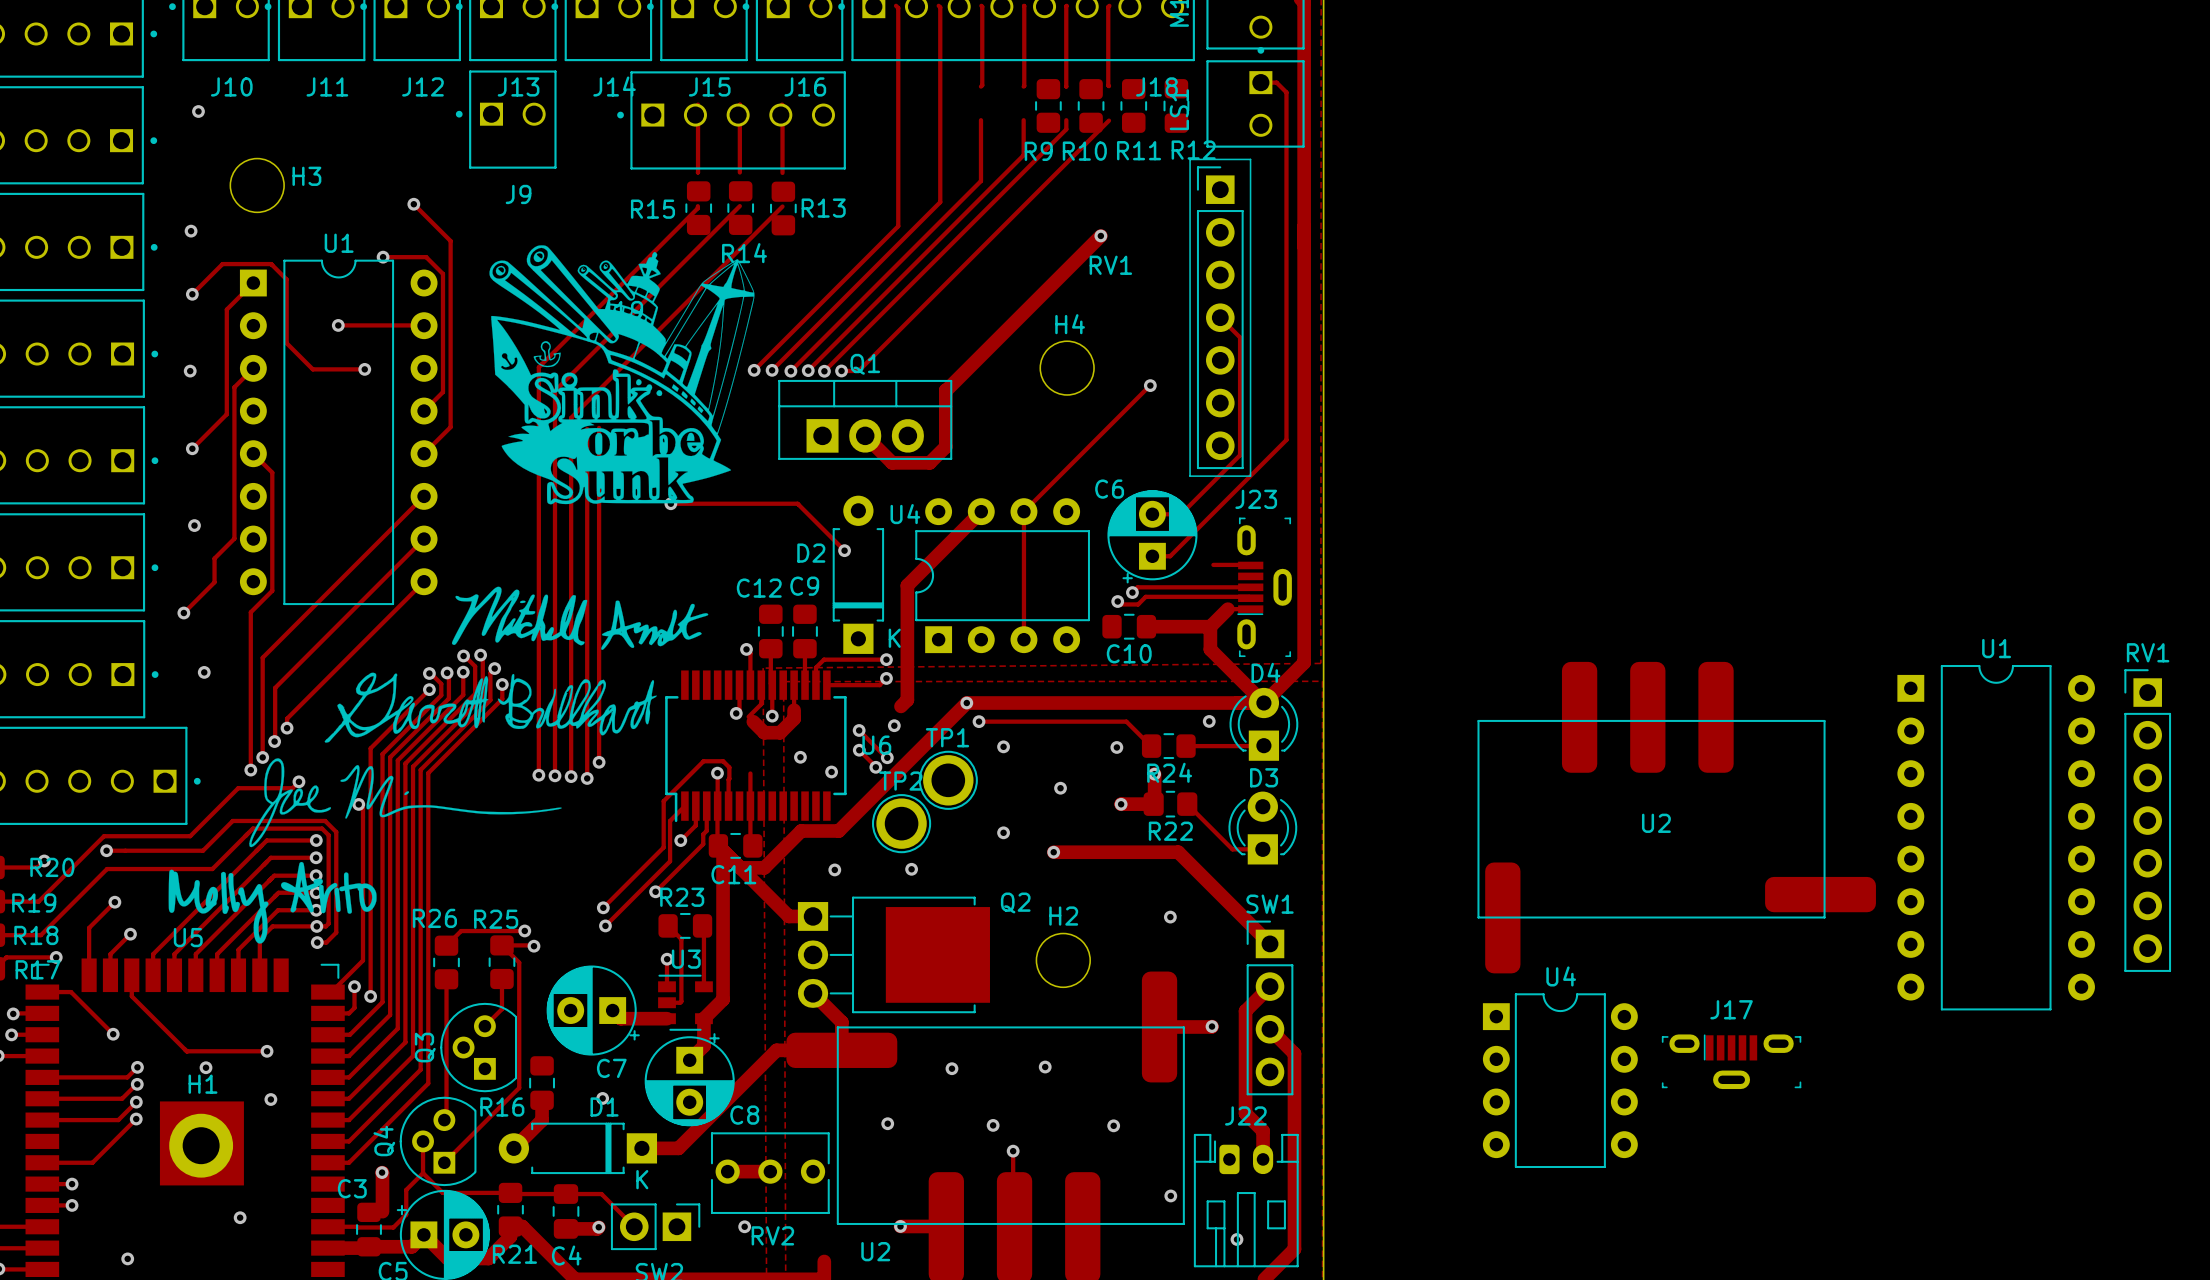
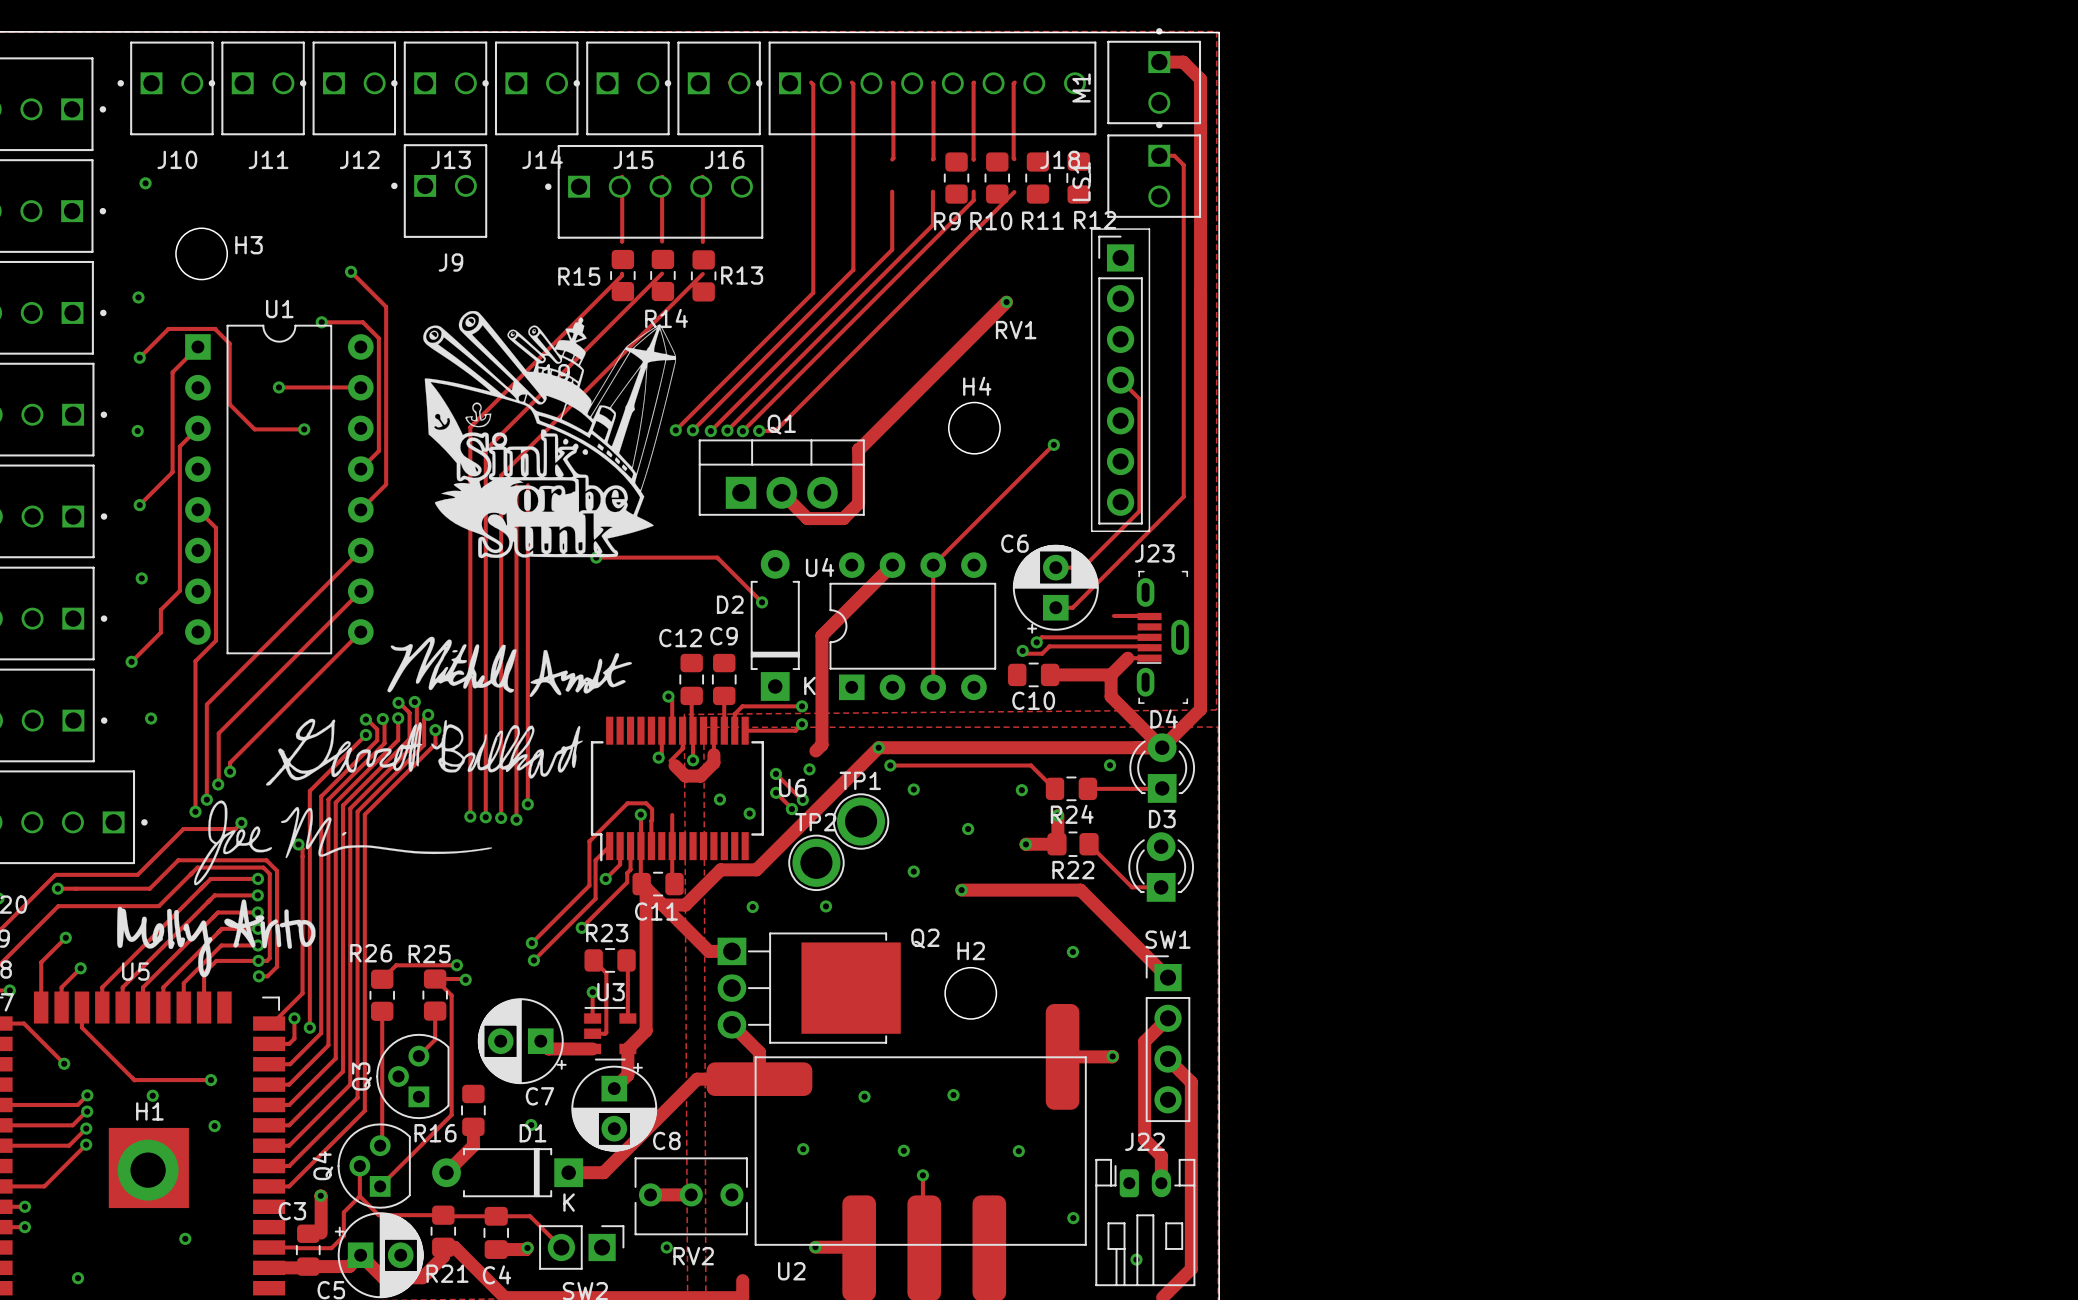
U2: (1676, 817) -> none
RV1: (2147, 820) -> none
U1: (1996, 837) -> none
J17: (1731, 1061) -> none
U4: (1560, 1080) -> none

